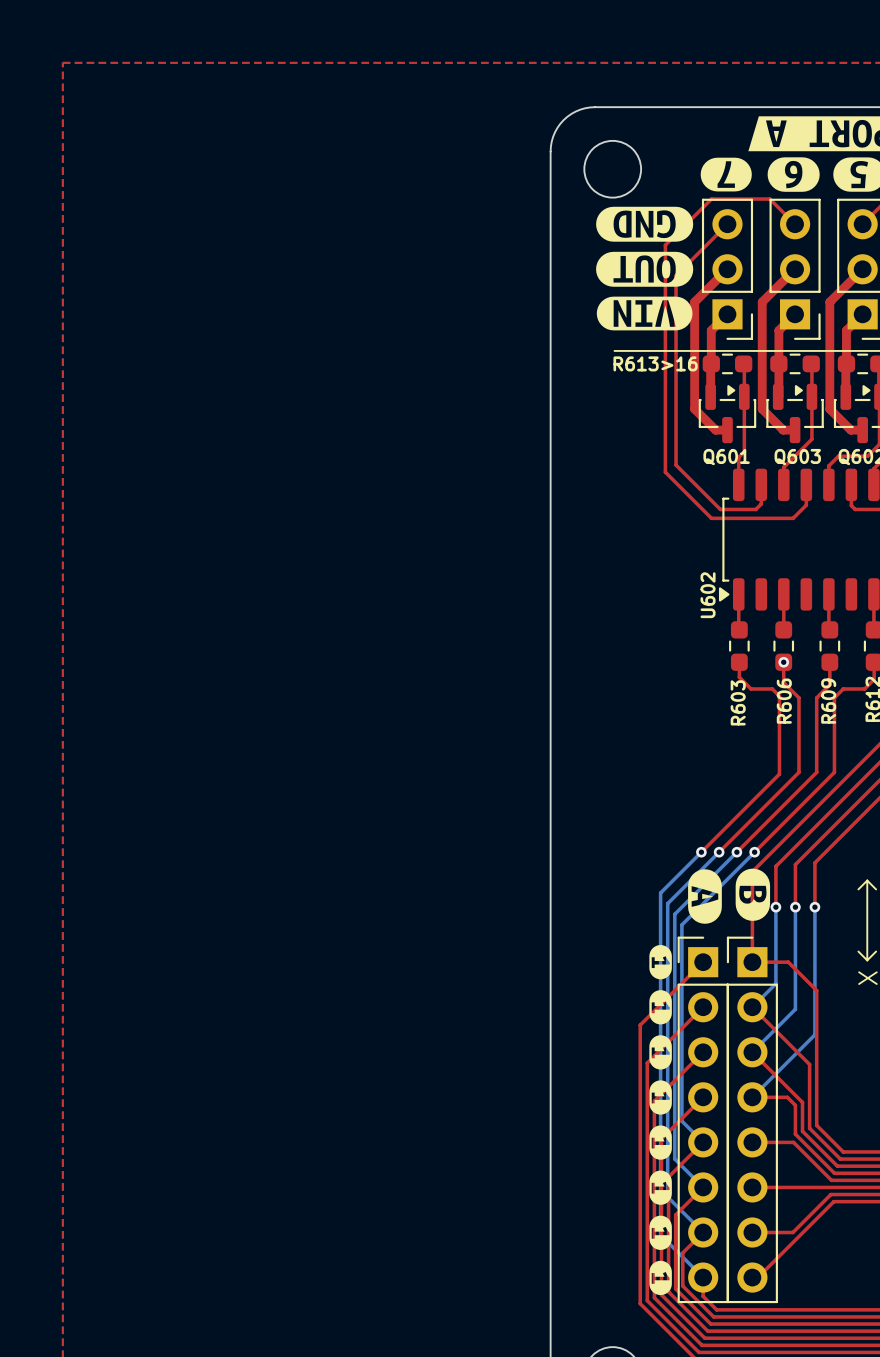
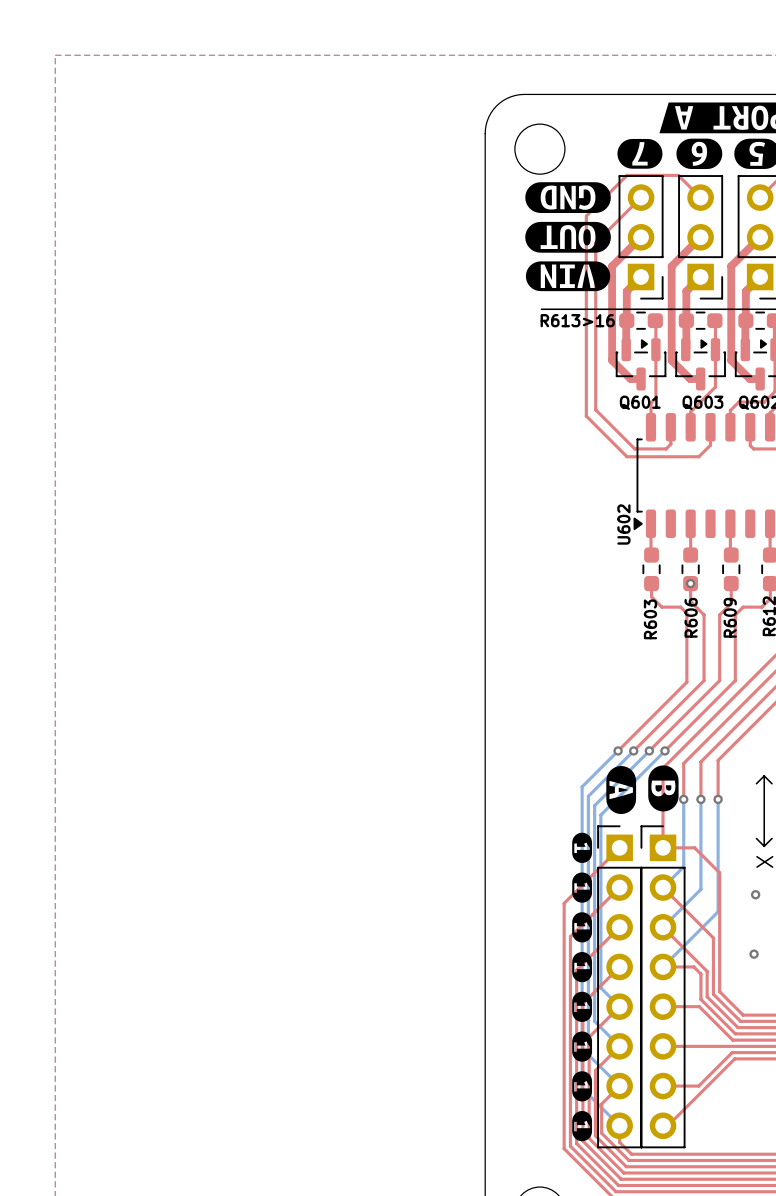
via: none -> (755, 894)
via: none -> (754, 954)

